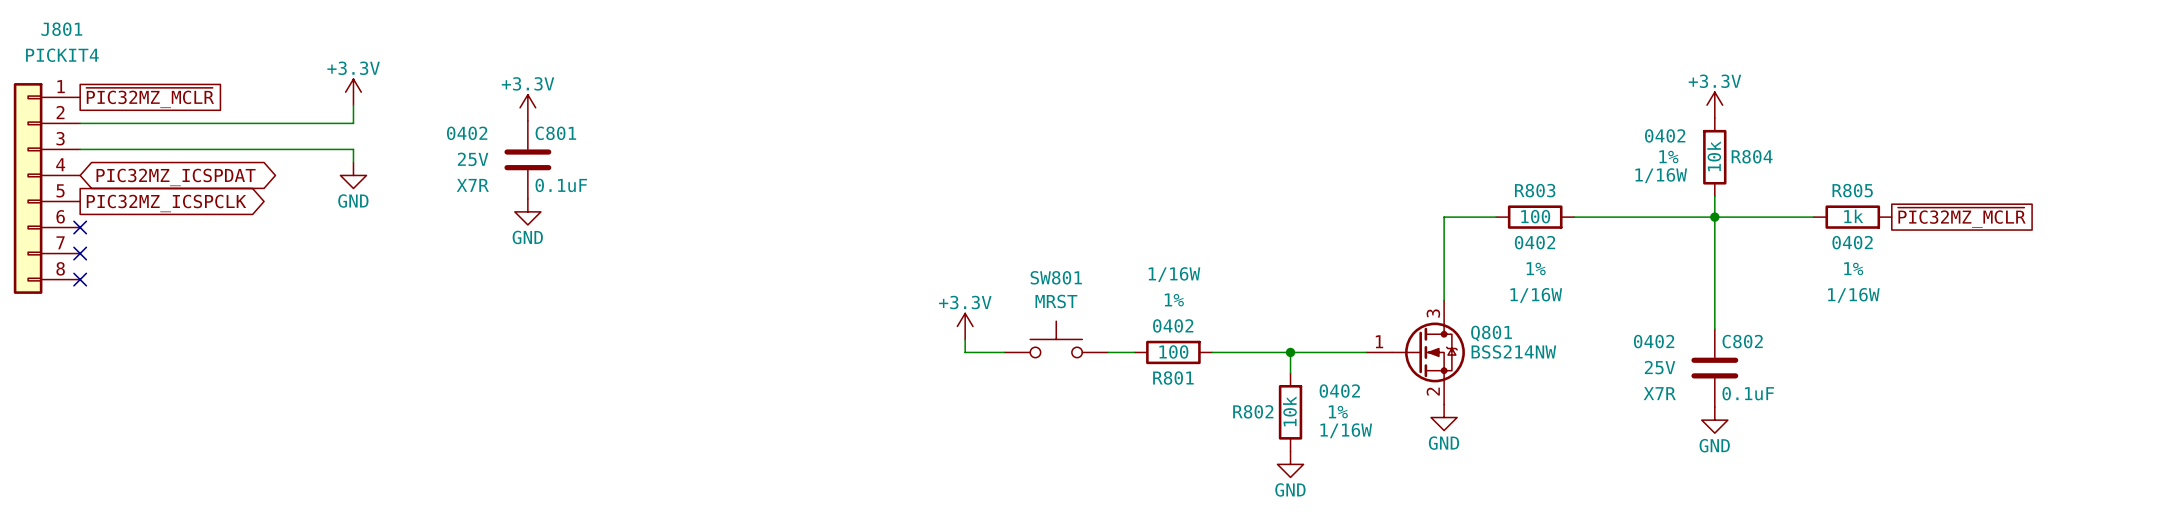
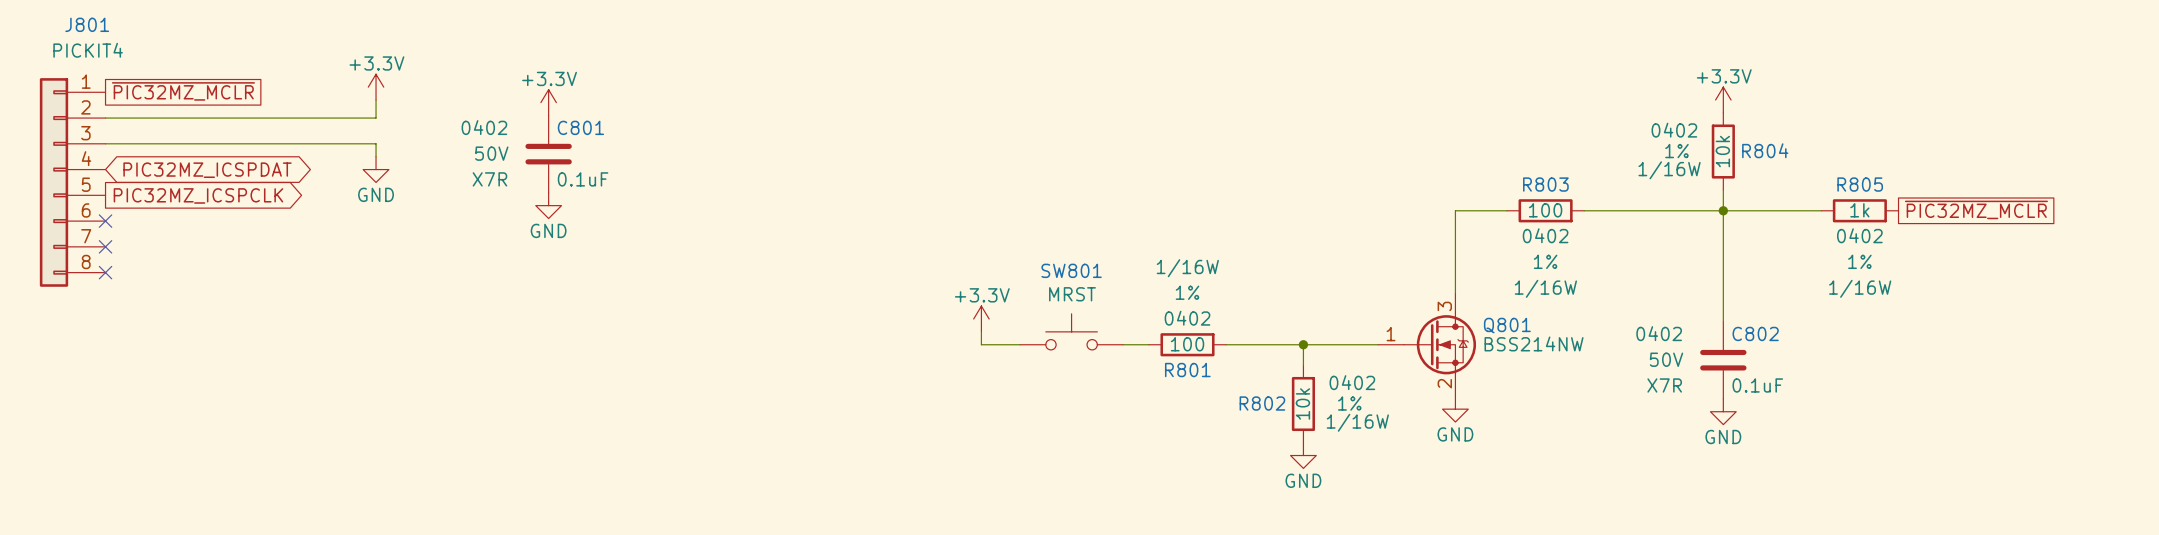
C801 text: 25V (473, 159) -> 50V (491, 153)
C802 text: 25V (1660, 367) -> 50V (1666, 359)

